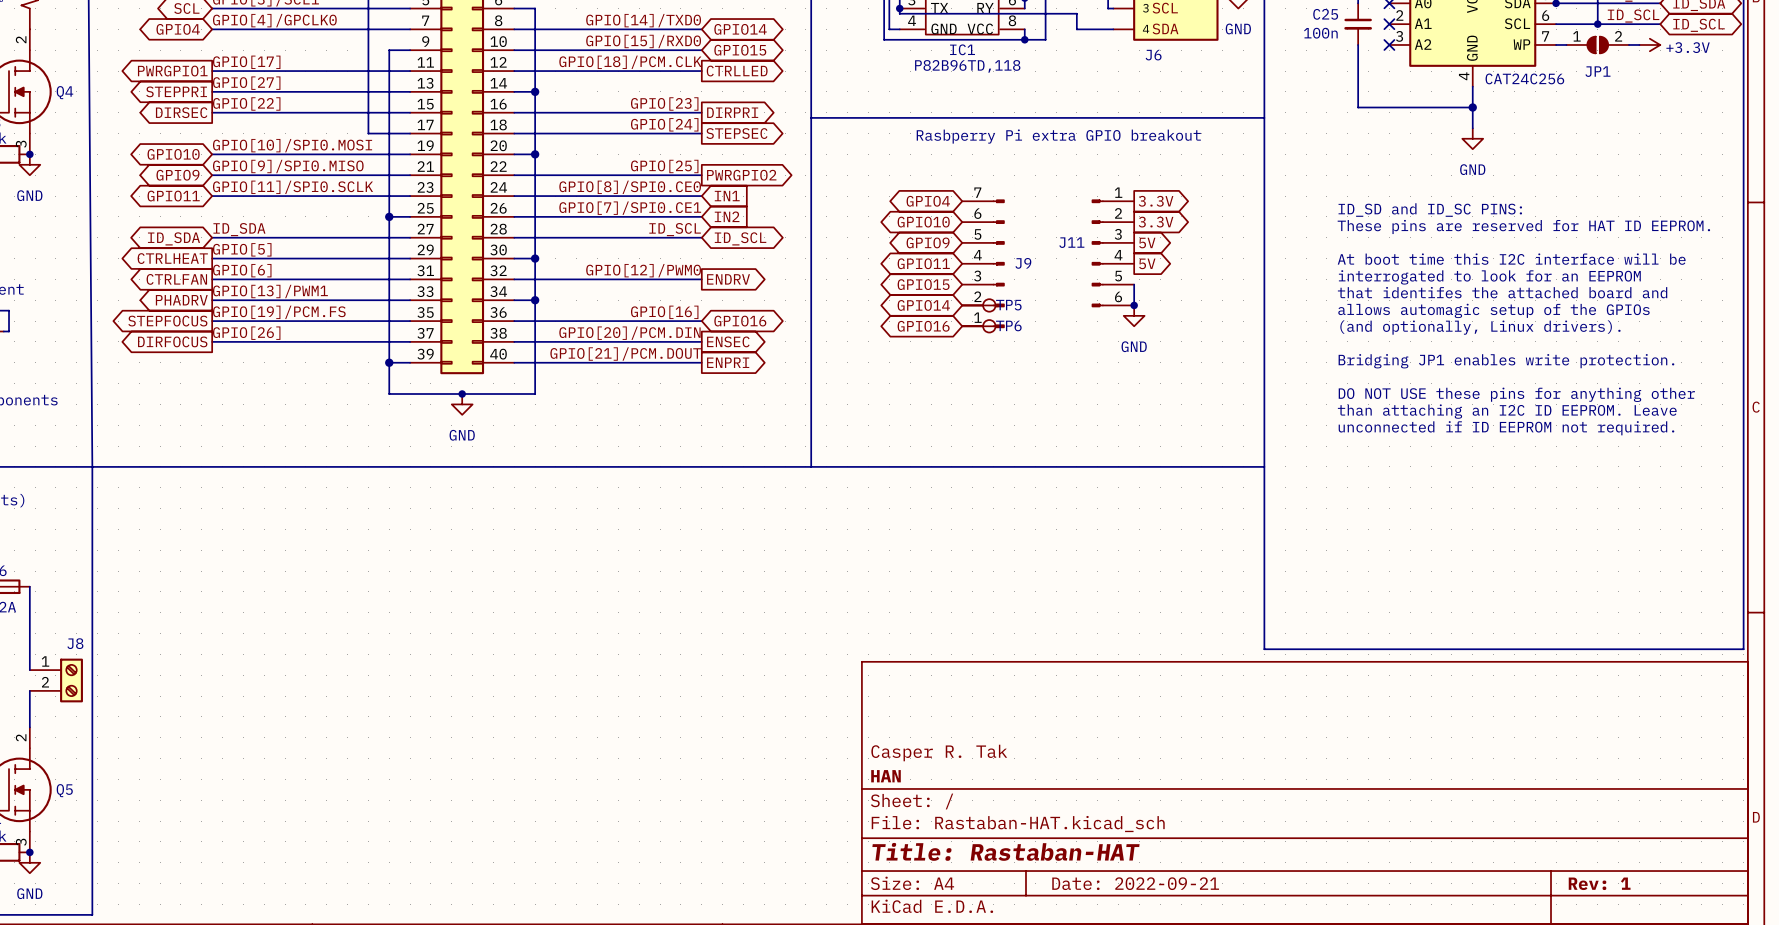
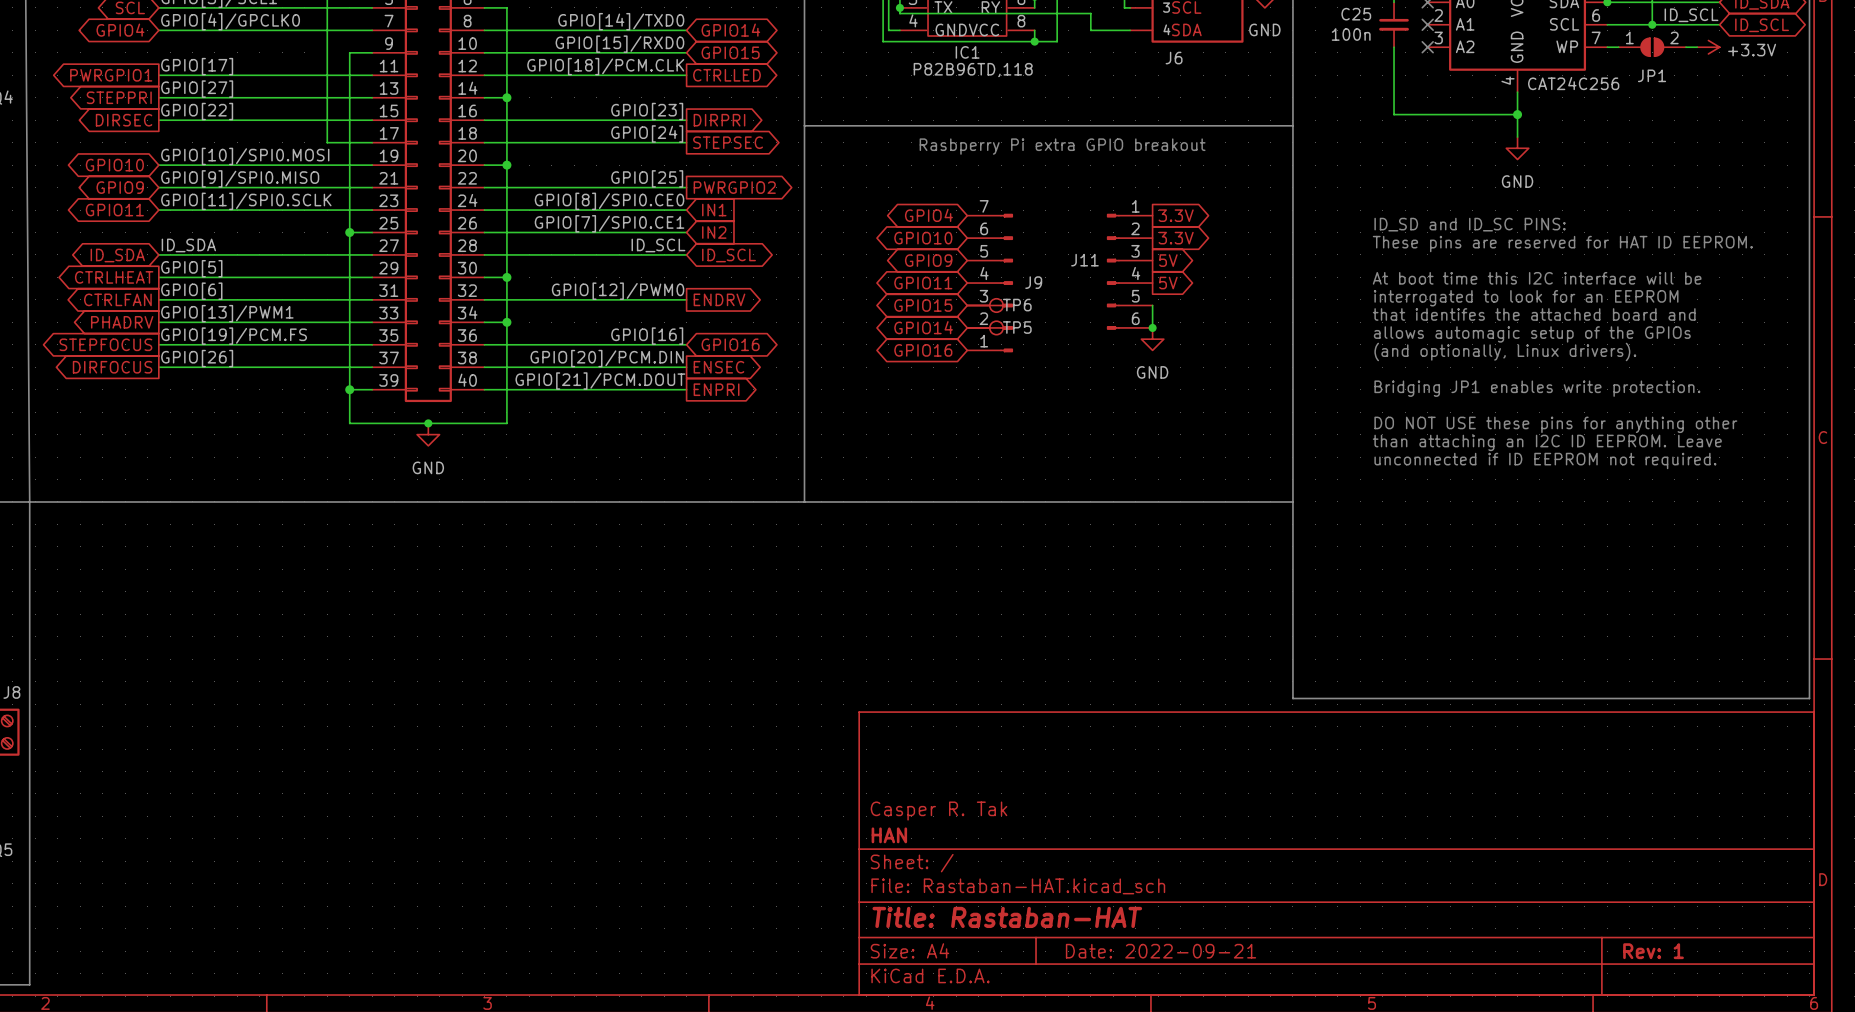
TP6 position: (978, 326) -> (985, 305)

